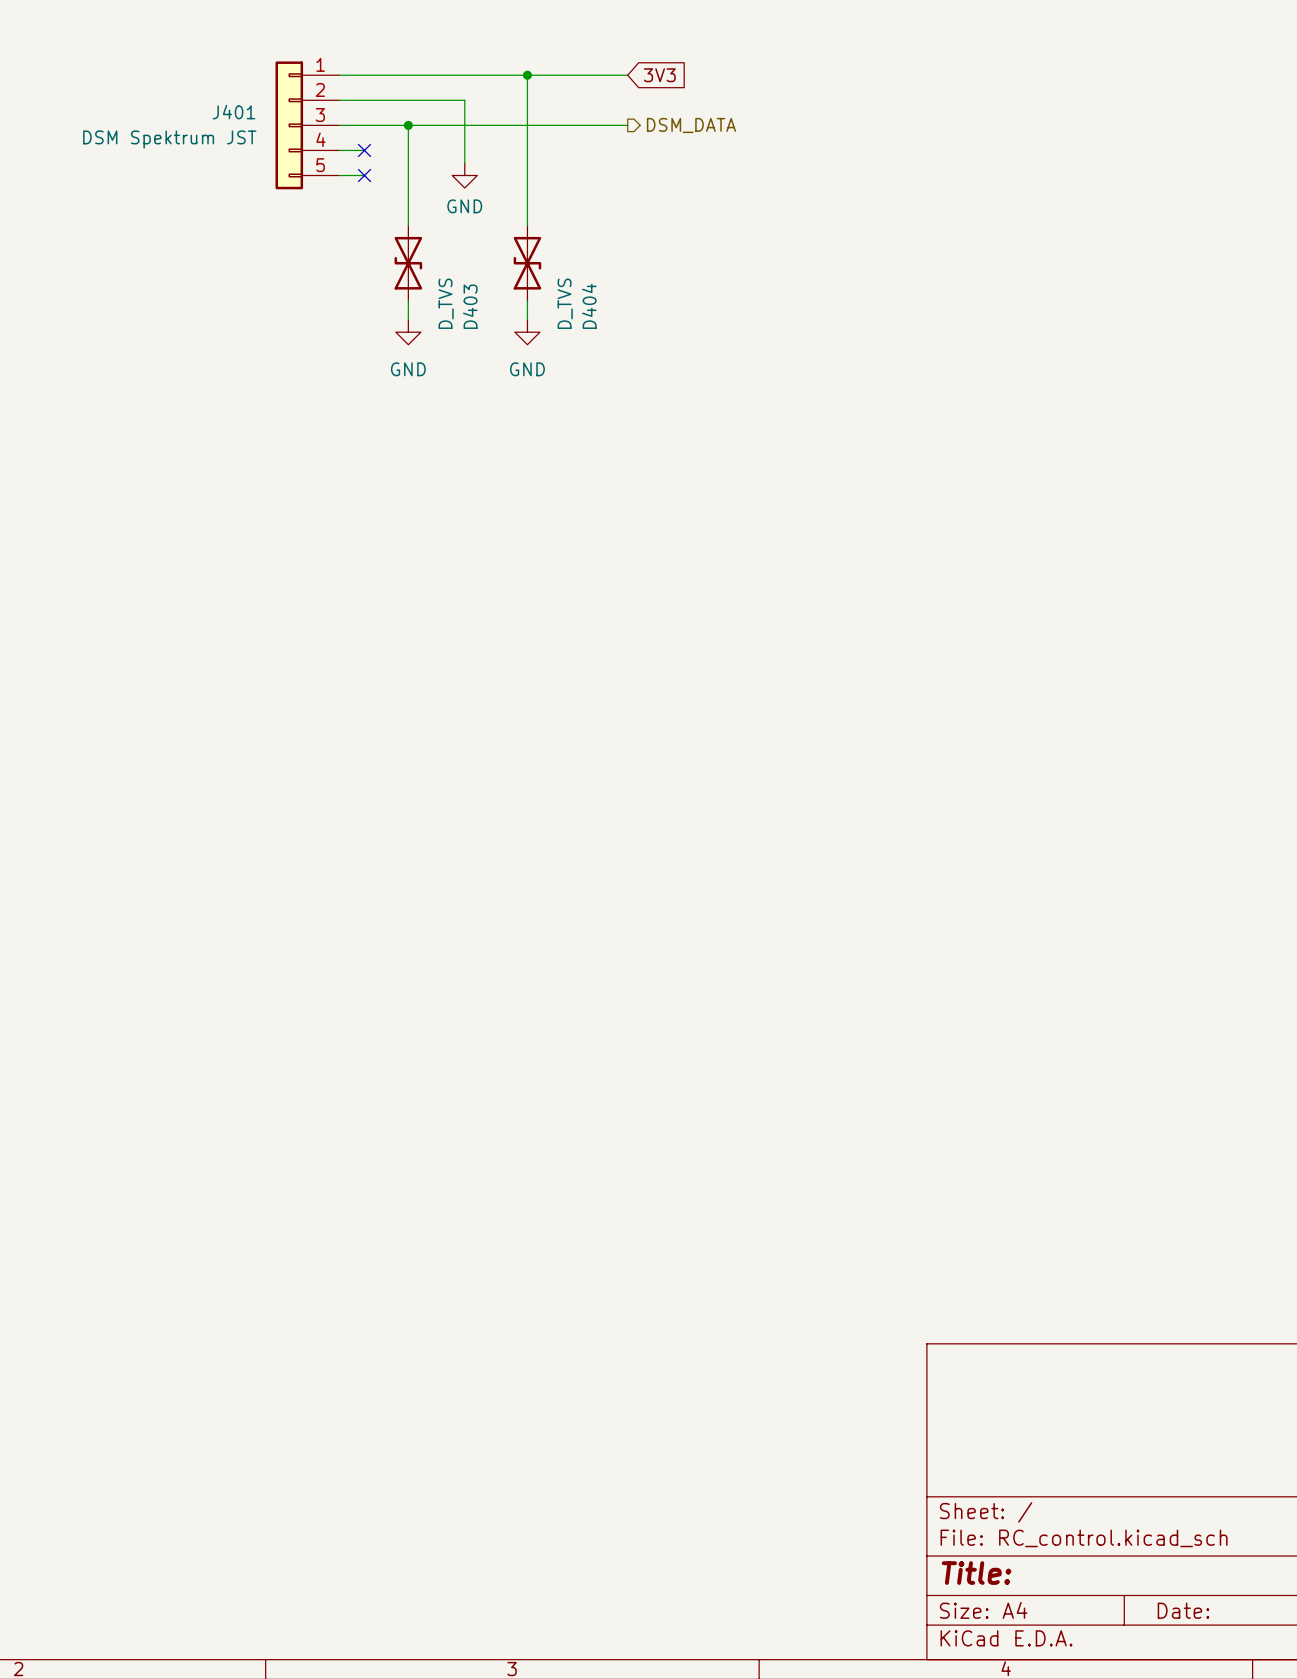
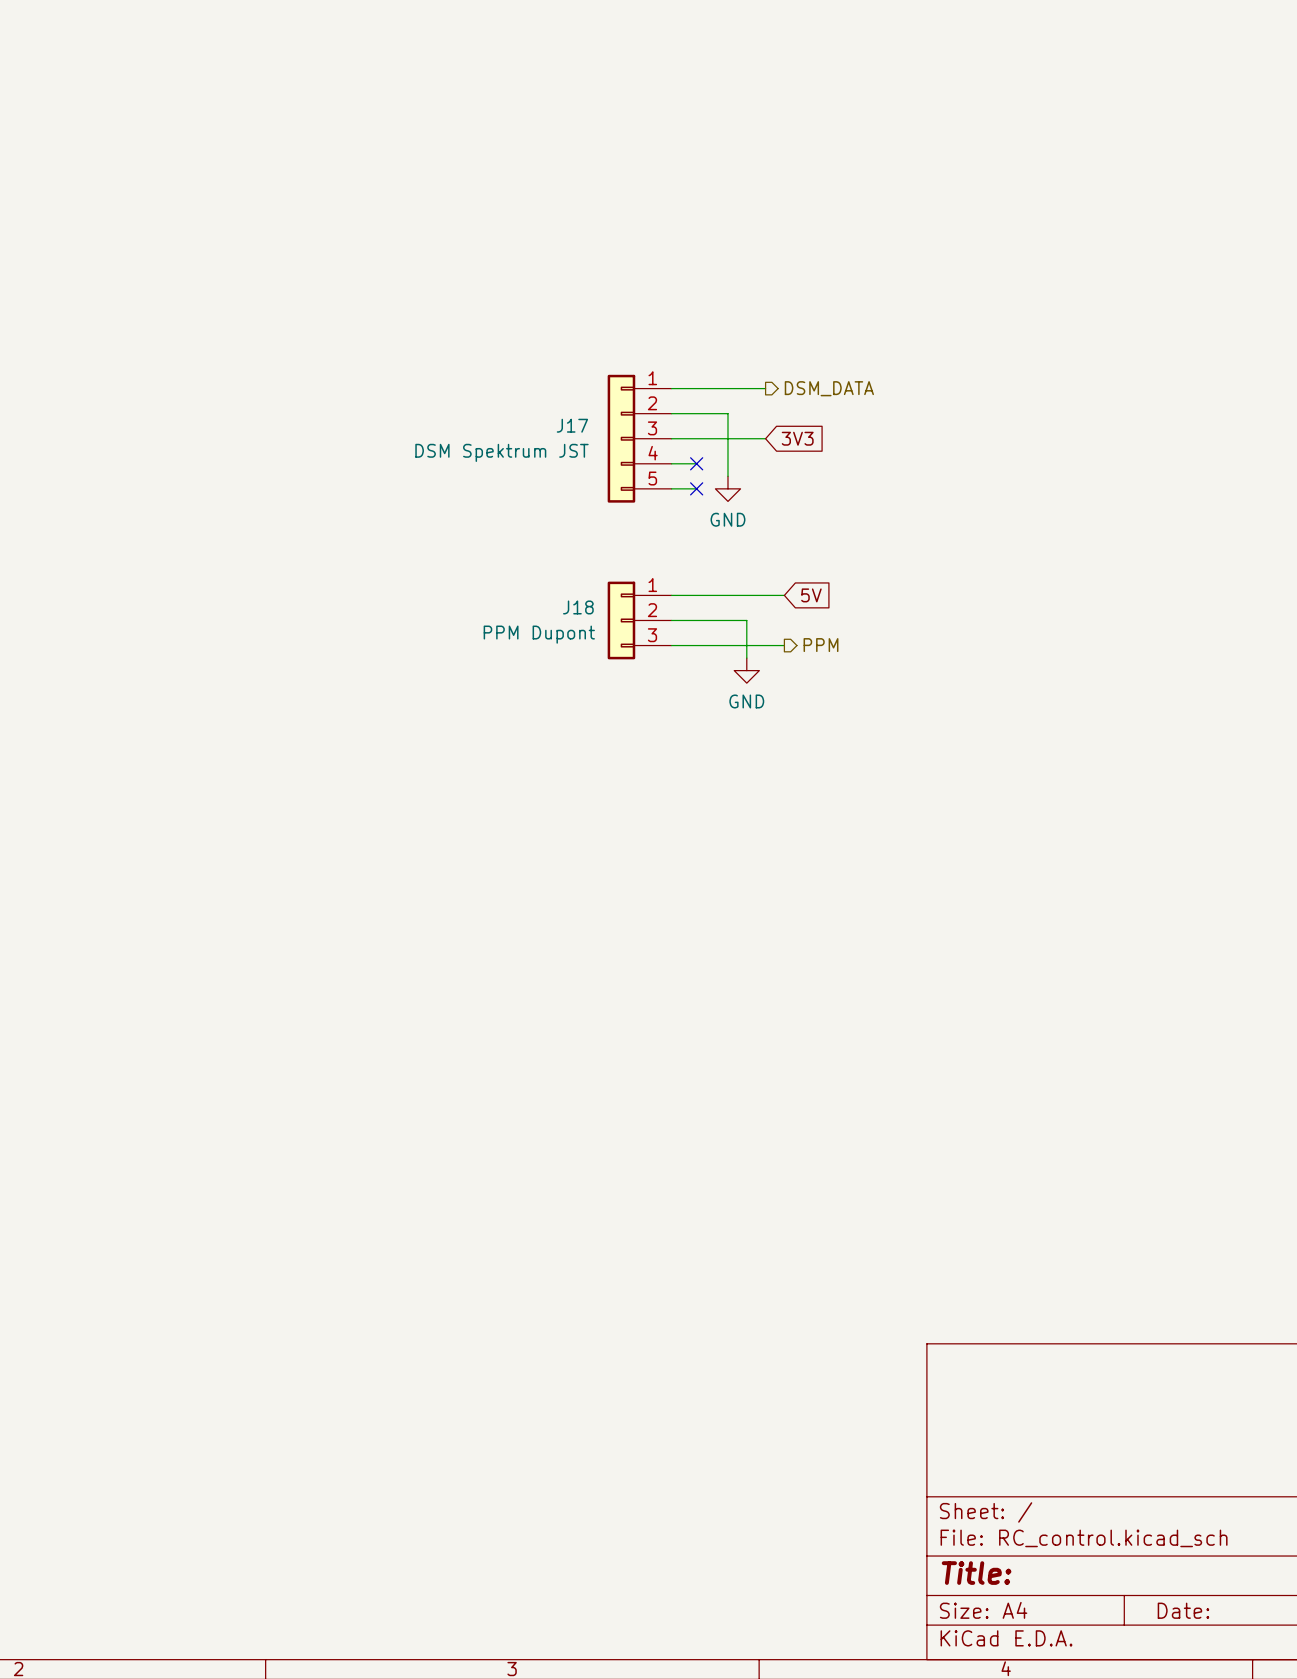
wire: (339, 75) (627, 75) -> none
wire: (527, 75) (527, 225) -> none
junction: (527, 75) -> none
global label: 3V3 (659, 75) -> none
wire: (339, 100) (464, 100) (464, 162) -> none
J401: DSM Spektrum JST (307, 125) -> none
wire: (339, 125) (627, 125) -> none
wire: (408, 125) (408, 225) -> none
junction: (408, 125) -> none
hierarchical label: DSM_DATA (691, 125) -> none
wire: (339, 150) (364, 150) -> none
no-connect mark: (364, 150) -> none
wire: (339, 175) (364, 175) -> none
no-connect mark: (364, 175) -> none
power symbol: GND (464, 175) -> none
D403: D_TVS (408, 263) -> none
D404: D_TVS (527, 263) -> none
wire: (408, 300) (408, 319) -> none
wire: (527, 300) (527, 319) -> none
power symbol: GND (408, 332) -> none
power symbol: GND (527, 332) -> none
wire: none -> (671, 388) (765, 388)
hierarchical label: none -> DSM_DATA (829, 388)
wire: none -> (671, 413) (727, 413) (727, 476)
J17: none -> DSM Spektrum JST (639, 438)
wire: none -> (671, 438) (765, 438)
global label: none -> 3V3 (797, 438)
wire: none -> (671, 463) (696, 463)
no-connect mark: none -> (696, 463)
wire: none -> (671, 488) (696, 488)
no-connect mark: none -> (696, 488)
power symbol: none -> GND (727, 488)
wire: none -> (671, 595) (784, 595)
global label: none -> 5V (811, 595)
J18: none -> PPM Dupont (639, 620)
wire: none -> (671, 620) (746, 620) (746, 658)
wire: none -> (671, 645) (784, 645)
hierarchical label: none -> PPM (821, 645)
power symbol: none -> GND (746, 670)

